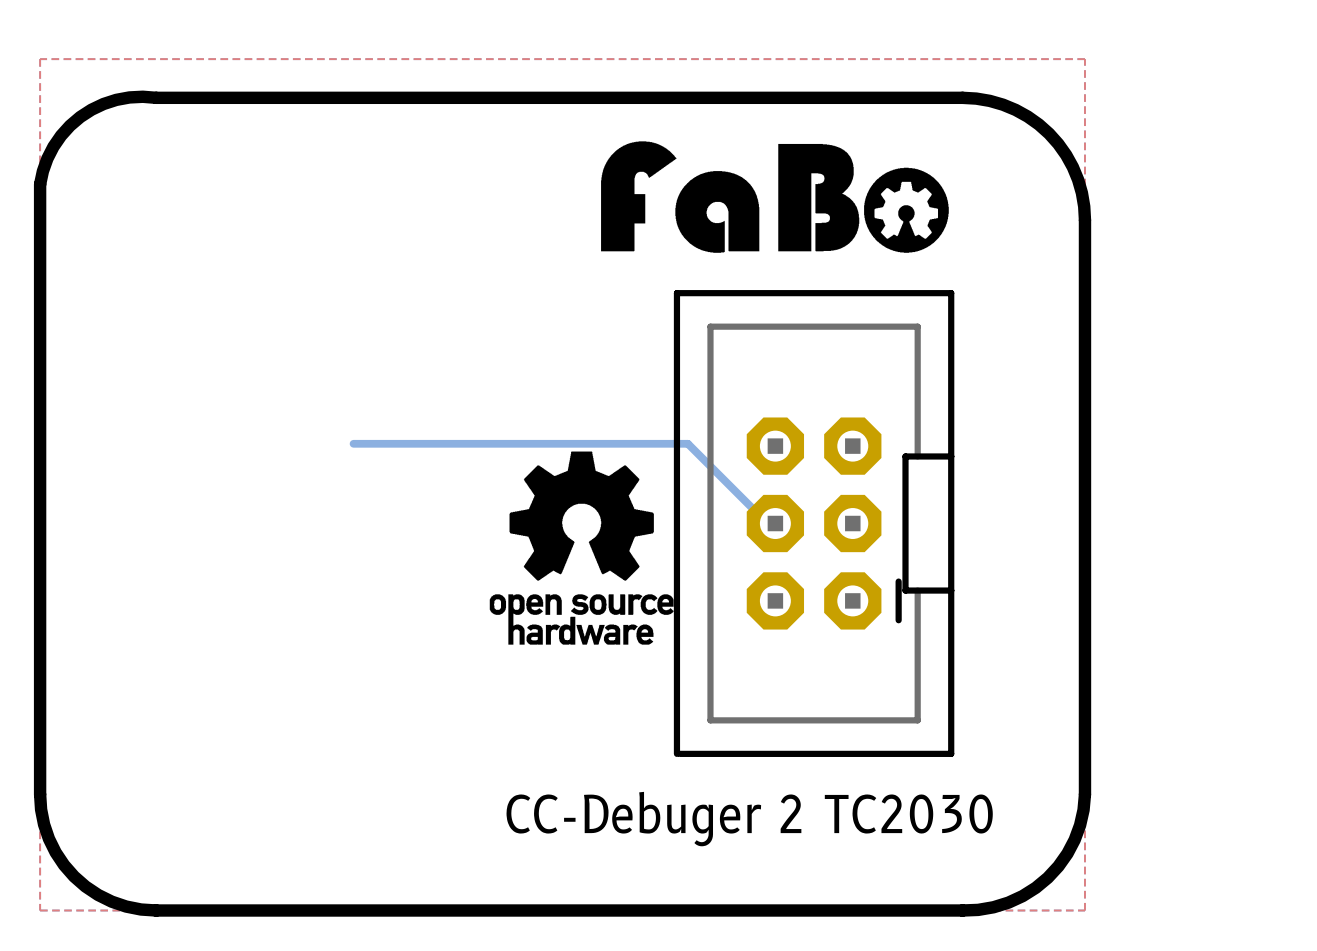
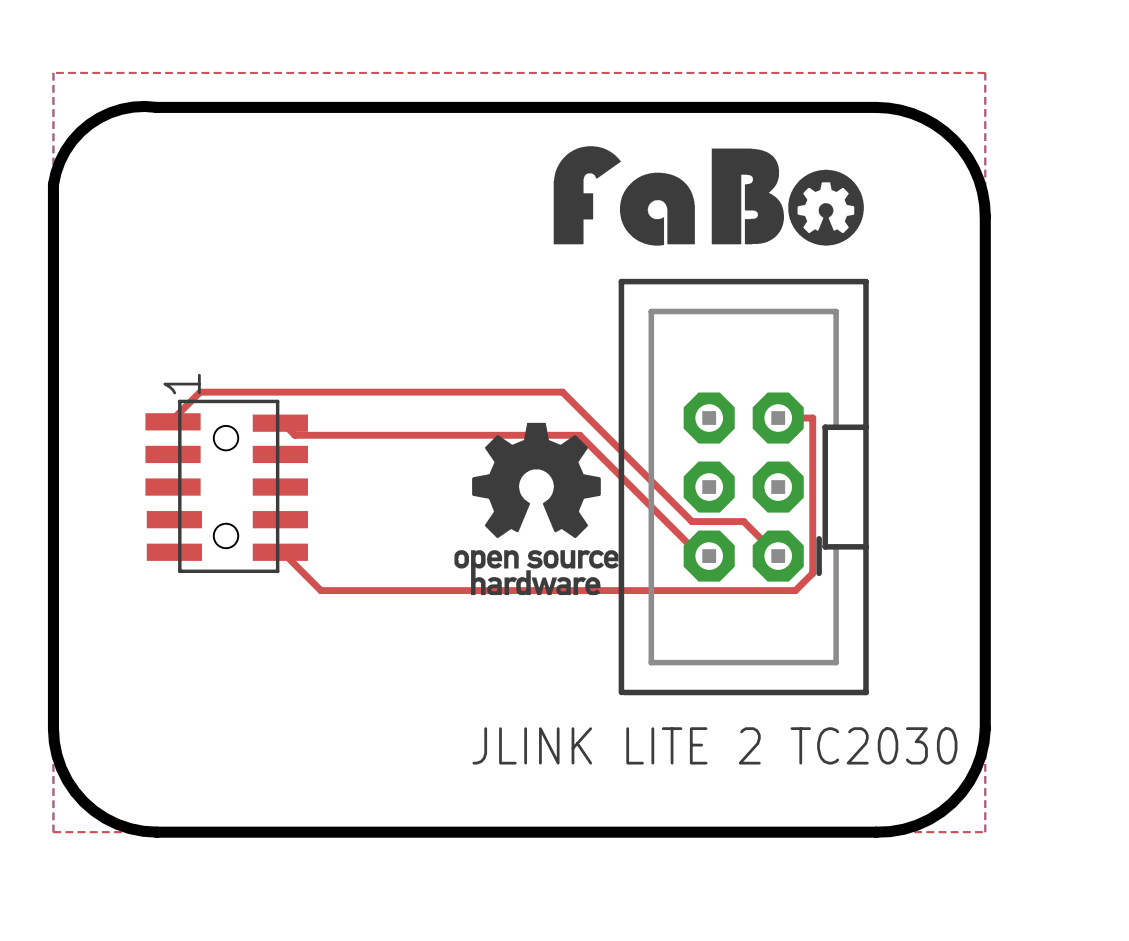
bottom track: (353, 443) (687, 443) (771, 527) (775, 523) -> none
top track: none -> (778, 418) (812, 418) (812, 573) (795, 590) (320, 590) (280, 552)
top track: none -> (173, 421) (174, 418) (200, 392) (562, 392) (691, 521) (743, 521) (778, 556)
top track: none -> (280, 423) (295, 435) (579, 435) (700, 556) (709, 556)
part: none -> (226, 486)
text: CC-Debuger 2 TC2030 (749, 819) -> JLINK LITE 2 TC2030 (714, 745)

